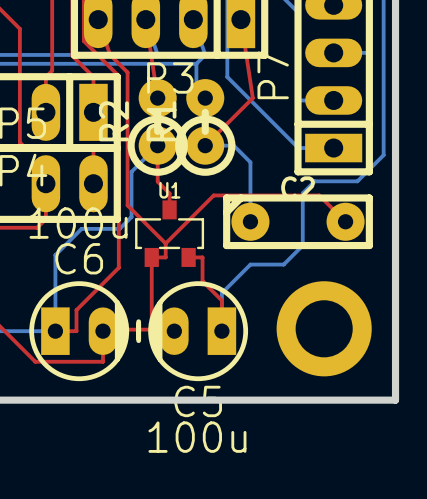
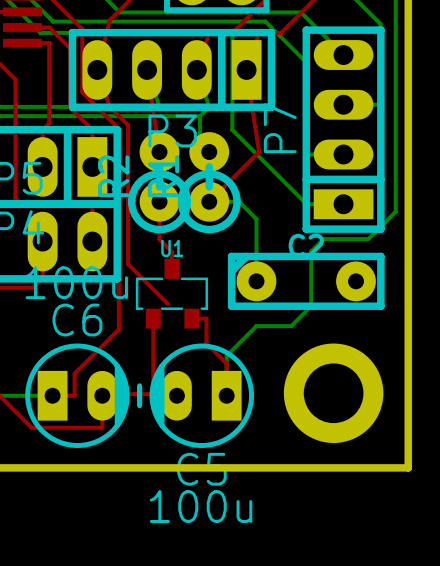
bottom track: (157, 145) (131, 171) (131, 217) (119, 228) (81, 228) (55, 255) (55, 331) -> none
top track: (345, 221) (319, 195) (213, 195) (165, 243) (165, 257) (151, 257) -> none

